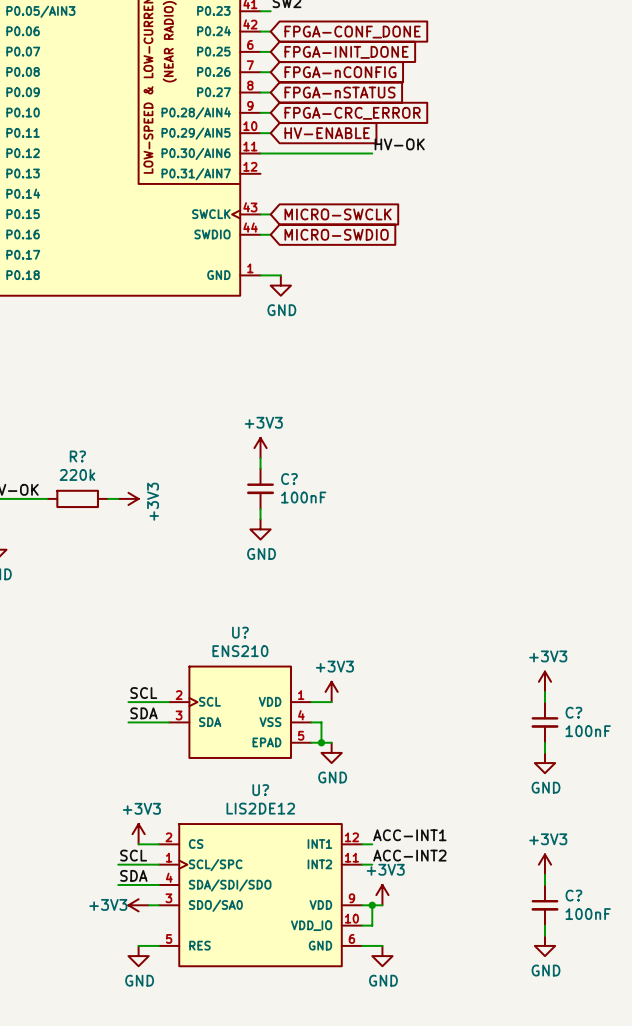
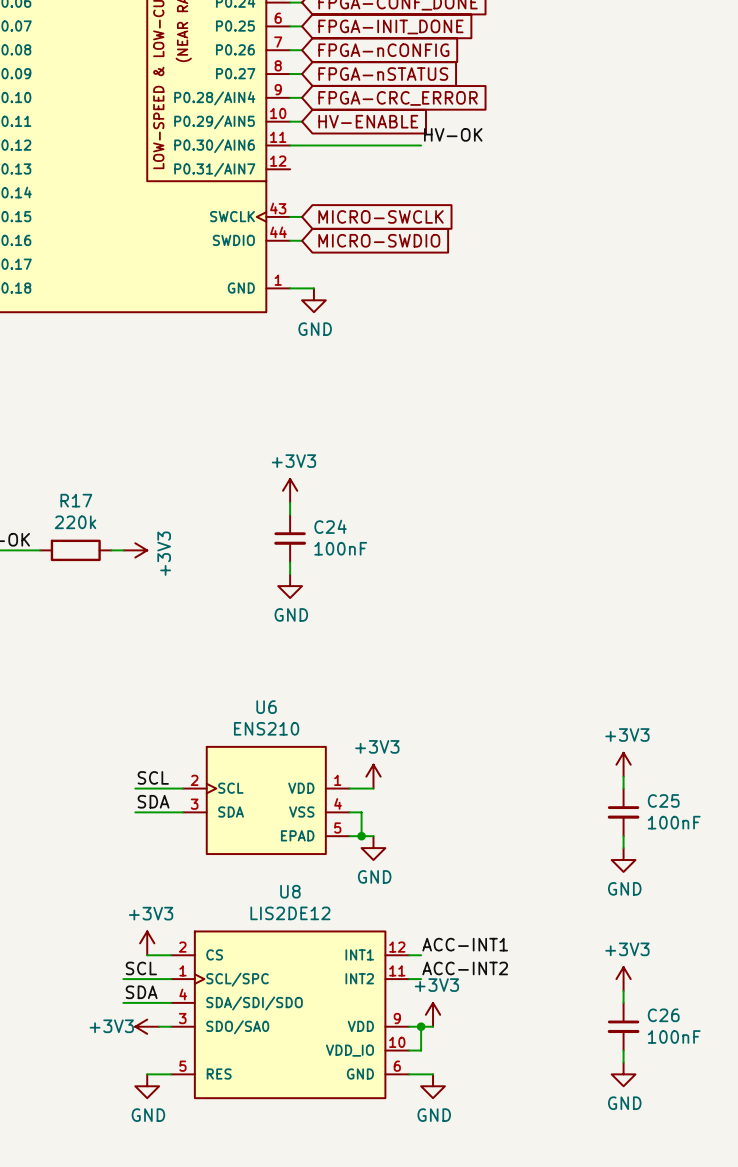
R? name: R? (77, 456) -> R17 (76, 500)
C? name: C? (289, 479) -> C24 (330, 526)
U? name: U? (240, 632) -> U6 (266, 707)
C? name: C? (573, 712) -> C25 (663, 800)
U? name: U? (260, 790) -> U8 (290, 891)
C? name: C? (573, 895) -> C26 (663, 1015)

